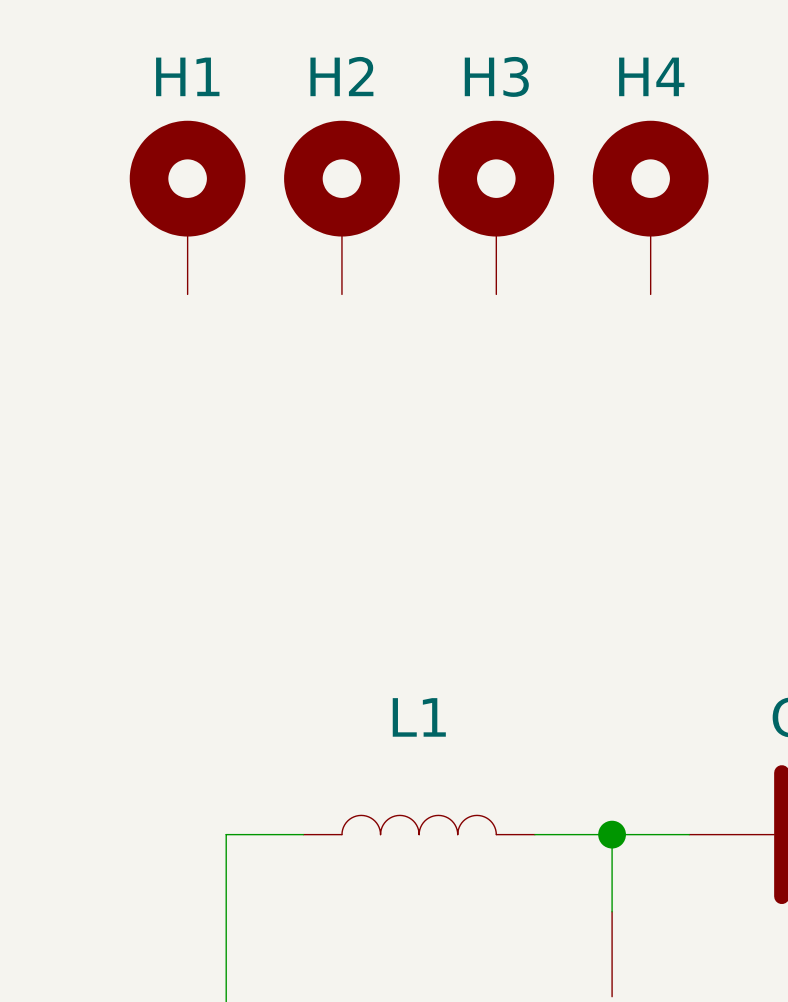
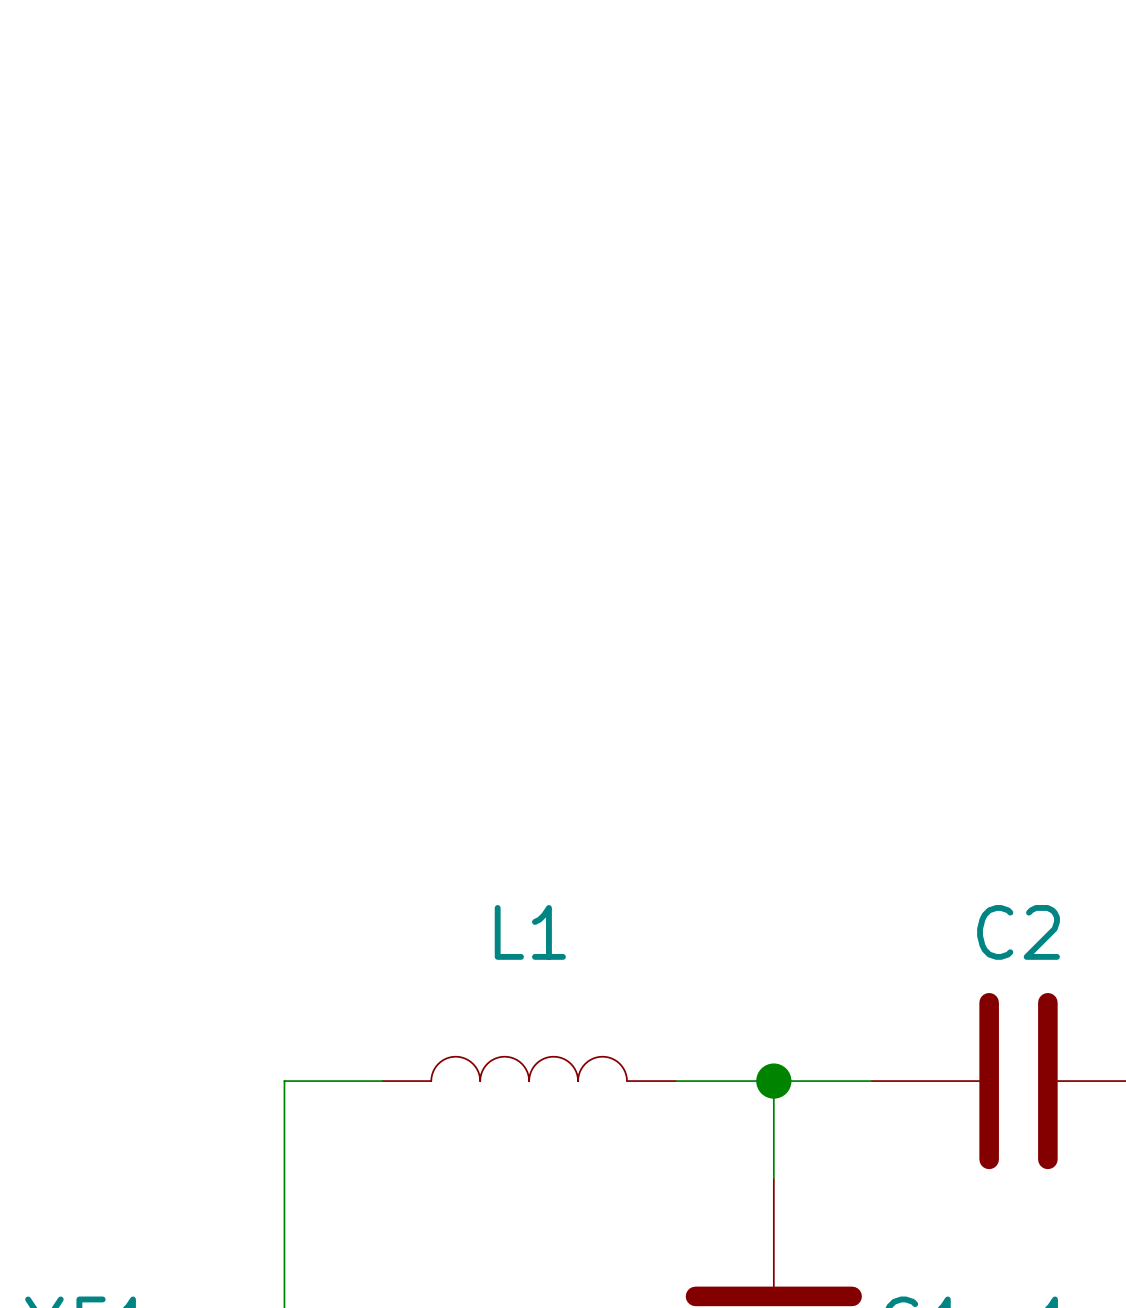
H1: (187, 207) -> none
H2: (341, 207) -> none
H3: (496, 207) -> none
H4: (650, 207) -> none

